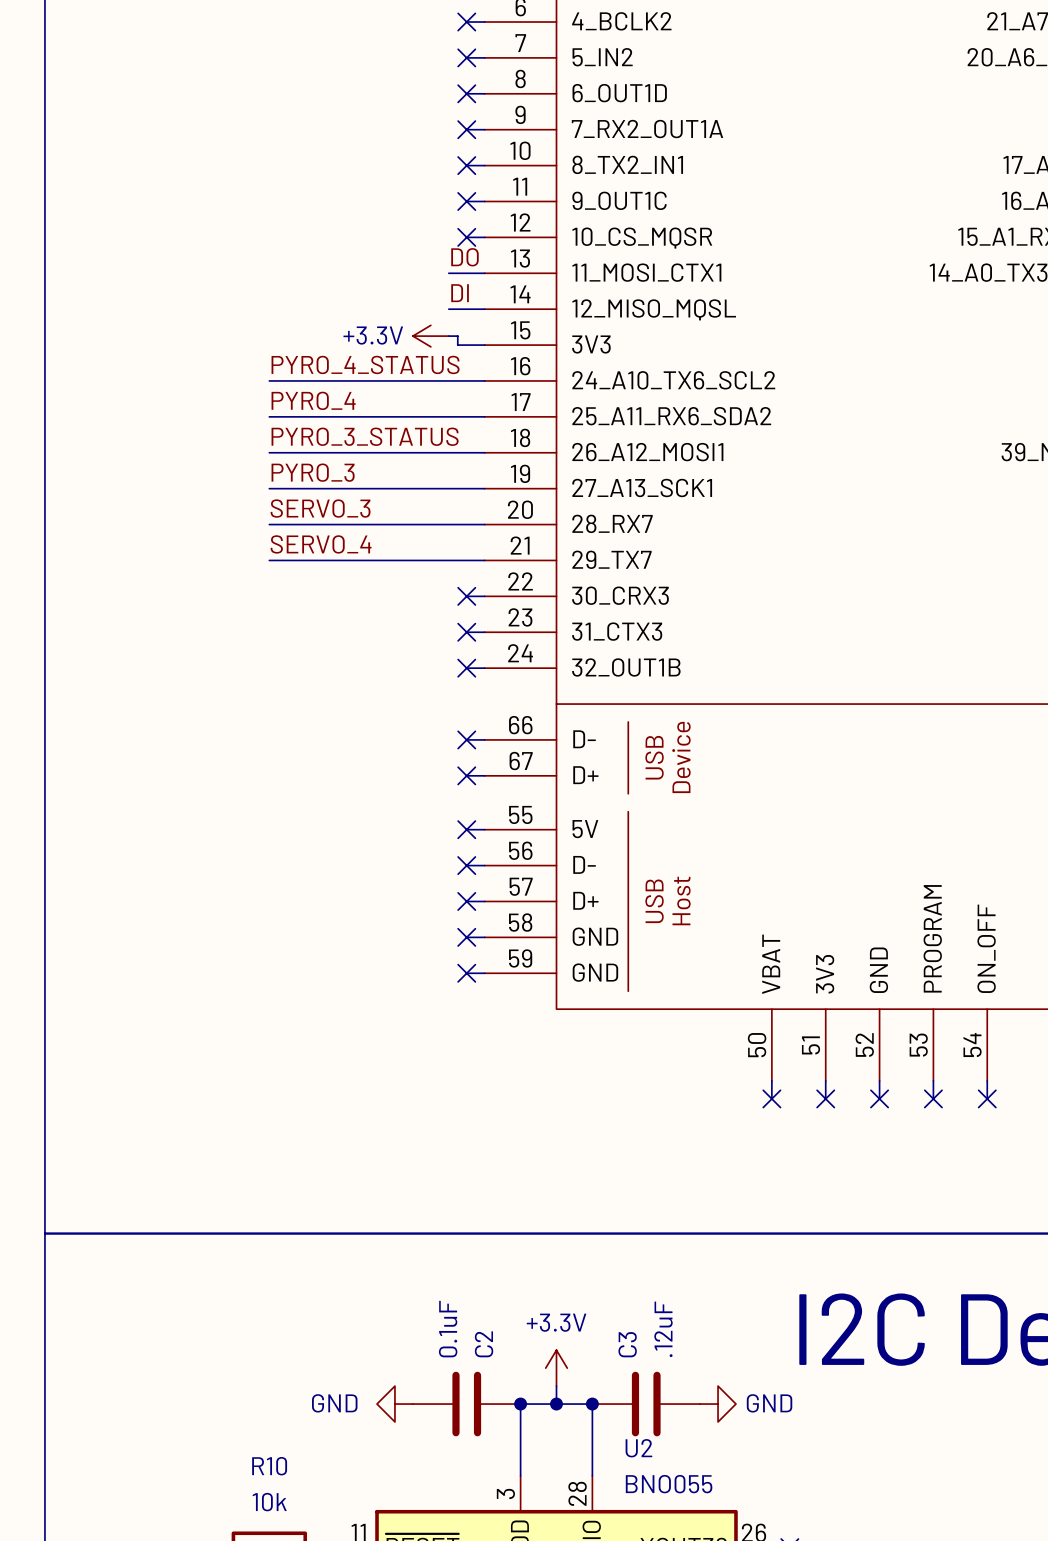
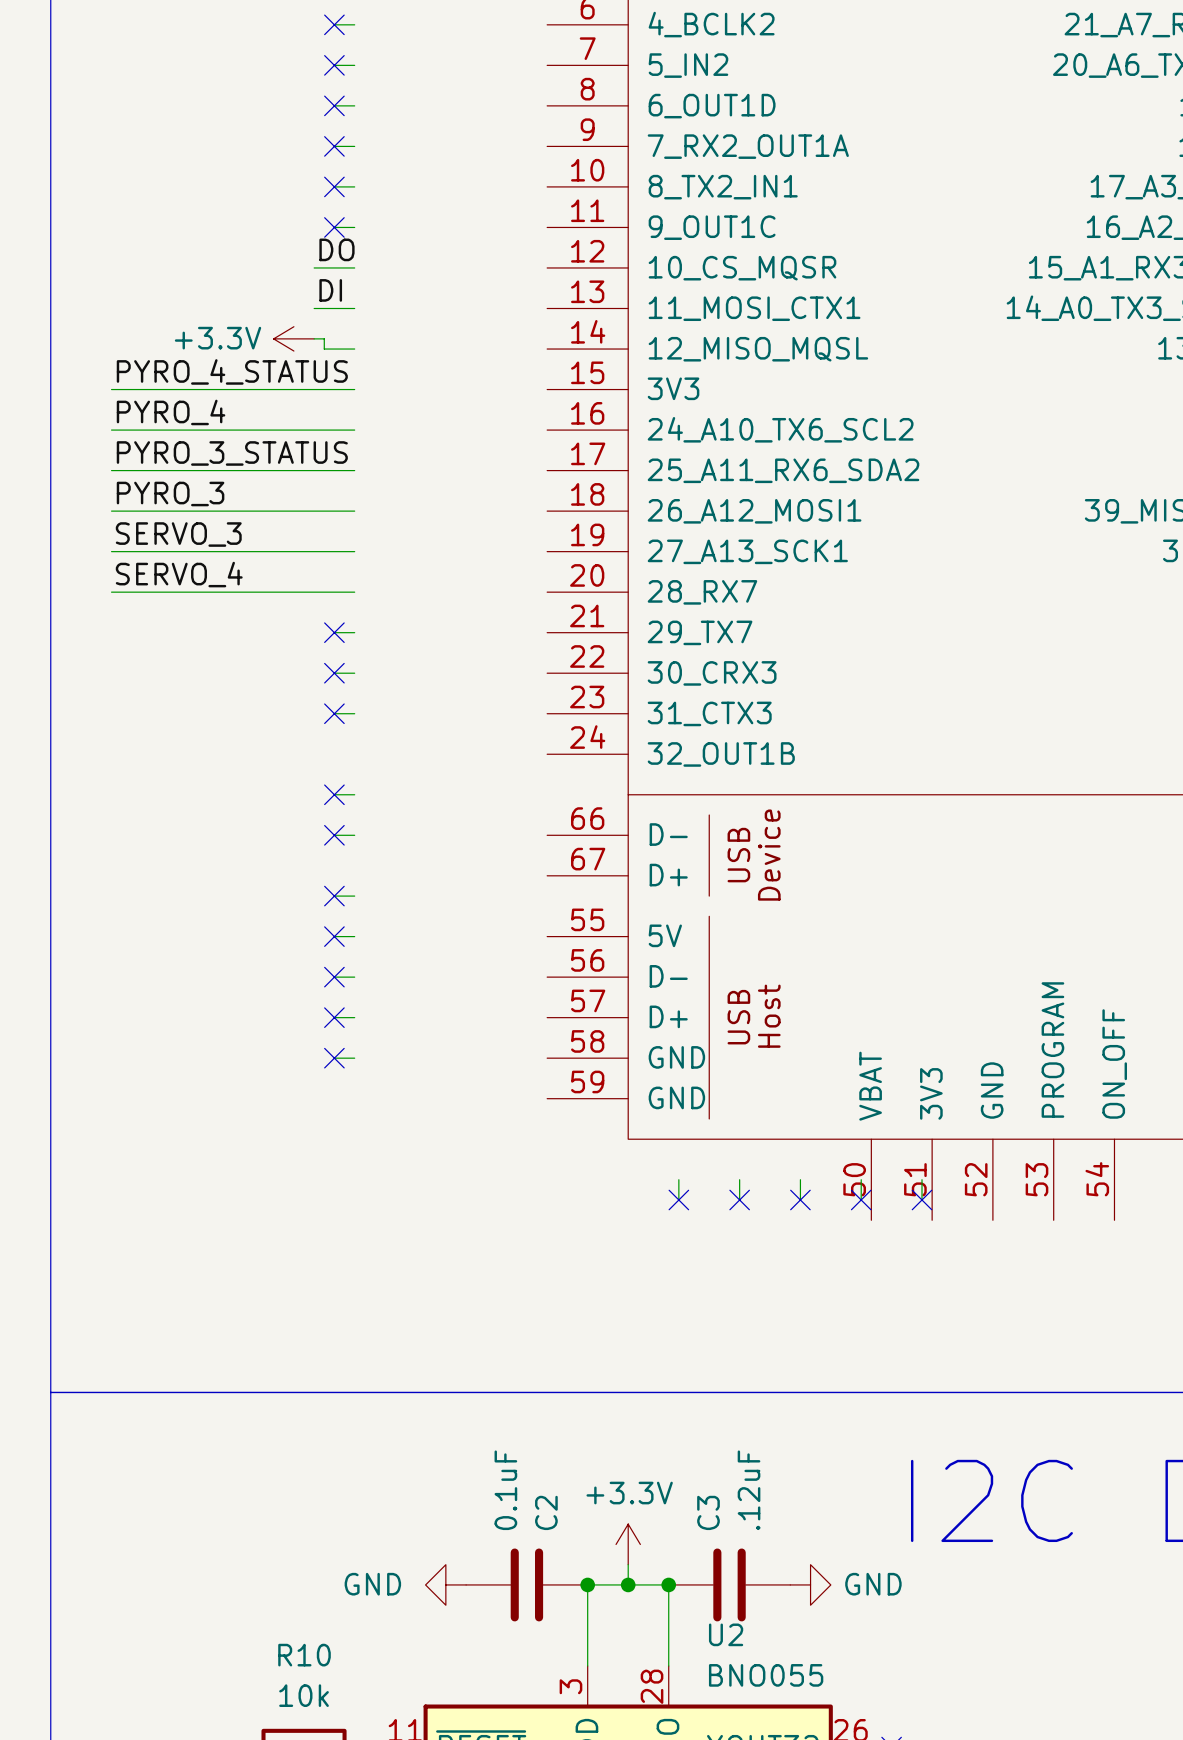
no-connect mark: none -> (334, 24)
wire: (466, 22) (484, 22) -> none
no-connect mark: (466, 22) -> none
no-connect mark: none -> (334, 65)
wire: (466, 57) (484, 57) -> (334, 24) (354, 24)
no-connect mark: (466, 57) -> none
no-connect mark: none -> (334, 105)
wire: (466, 93) (484, 93) -> (334, 65) (354, 65)
no-connect mark: (466, 93) -> none
no-connect mark: none -> (334, 146)
wire: (466, 129) (484, 129) -> (334, 105) (354, 105)
no-connect mark: (466, 129) -> none
no-connect mark: none -> (334, 186)
wire: (466, 165) (484, 165) -> (334, 146) (354, 146)
no-connect mark: (466, 165) -> none
no-connect mark: none -> (334, 227)
wire: (466, 201) (484, 201) -> (334, 186) (354, 186)
no-connect mark: (466, 201) -> none
wire: (466, 237) (484, 237) -> (334, 227) (354, 227)
no-connect mark: (466, 237) -> none
label position: DO (464, 257) -> DO (336, 249)
wire: (448, 273) (484, 273) -> (314, 267) (354, 267)
label position: DI (460, 293) -> DI (330, 290)
wire: (448, 309) (484, 309) -> (314, 308) (354, 308)
power symbol position: +3.3V (430, 336) -> +3.3V (293, 338)
wire: (448, 336) (457, 336) (457, 345) (484, 345) -> (314, 338) (324, 338) (324, 349) (354, 349)
wire: none -> (111, 389) (354, 389)
label position: PYRO_4_STATUS (365, 364) -> PYRO_4_STATUS (232, 371)
wire: (314, 380) (484, 380) -> (111, 430) (304, 430)
label position: PYRO_4 (313, 400) -> PYRO_4 (171, 412)
wire: (314, 416) (484, 416) -> (111, 470) (304, 470)
label position: PYRO_3_STATUS (365, 436) -> PYRO_3_STATUS (232, 453)
wire: (314, 452) (484, 452) -> (111, 511) (304, 511)
label position: PYRO_3 (313, 472) -> PYRO_3 (170, 493)
wire: (314, 488) (484, 488) -> (111, 551) (304, 551)
label position: SERVO_3 (320, 508) -> SERVO_3 (178, 534)
wire: (314, 524) (484, 524) -> (111, 592) (304, 592)
label position: SERVO_4 (321, 544) -> SERVO_4 (179, 574)
wire: (269, 560) (296, 560) -> none
no-connect mark: none -> (334, 632)
wire: (314, 560) (484, 560) -> none
no-connect mark: none -> (334, 673)
wire: (466, 596) (484, 596) -> none
no-connect mark: (466, 596) -> none
no-connect mark: none -> (334, 713)
wire: (466, 632) (484, 632) -> (334, 673) (354, 673)
no-connect mark: (466, 632) -> none
wire: (466, 668) (484, 668) -> (334, 713) (354, 713)
no-connect mark: (466, 668) -> none
no-connect mark: none -> (334, 794)
no-connect mark: none -> (334, 835)
wire: (466, 739) (484, 739) -> (334, 794) (354, 794)
no-connect mark: (466, 739) -> none
wire: (466, 775) (484, 775) -> (334, 835) (354, 835)
no-connect mark: (466, 775) -> none
no-connect mark: none -> (334, 896)
no-connect mark: none -> (334, 936)
wire: (466, 829) (484, 829) -> (334, 896) (354, 896)
no-connect mark: (466, 829) -> none
no-connect mark: none -> (334, 977)
wire: (466, 865) (484, 865) -> (334, 936) (354, 936)
no-connect mark: (466, 865) -> none
no-connect mark: none -> (334, 1017)
wire: (466, 901) (484, 901) -> (334, 977) (354, 977)
no-connect mark: (466, 901) -> none
no-connect mark: none -> (334, 1058)
wire: (466, 937) (484, 937) -> (334, 1017) (354, 1017)
no-connect mark: (466, 937) -> none
wire: (466, 973) (484, 973) -> (334, 1058) (354, 1058)
no-connect mark: (466, 973) -> none
no-connect mark: none -> (678, 1199)
no-connect mark: none -> (739, 1199)
no-connect mark: none -> (800, 1199)
no-connect mark: none -> (861, 1199)
no-connect mark: none -> (921, 1199)
wire: (771, 1080) (771, 1098) -> (678, 1179) (678, 1199)
wire: (825, 1080) (825, 1098) -> (739, 1179) (739, 1199)
wire: (879, 1080) (879, 1098) -> (800, 1179) (800, 1199)
wire: (933, 1080) (933, 1098) -> (861, 1179) (861, 1199)
wire: (987, 1080) (987, 1098) -> (921, 1179) (921, 1199)
no-connect mark: (771, 1098) -> none
no-connect mark: (825, 1098) -> none
no-connect mark: (879, 1098) -> none
no-connect mark: (933, 1098) -> none
no-connect mark: (987, 1098) -> none

